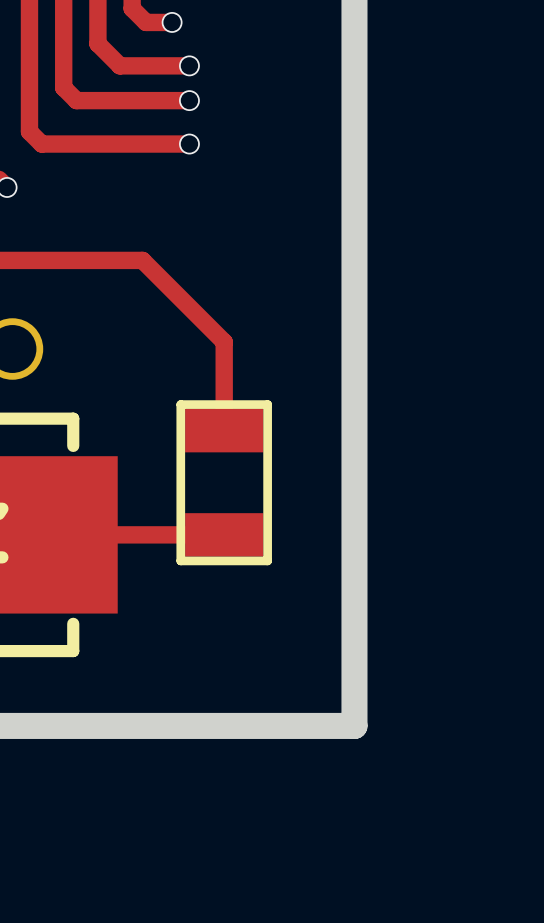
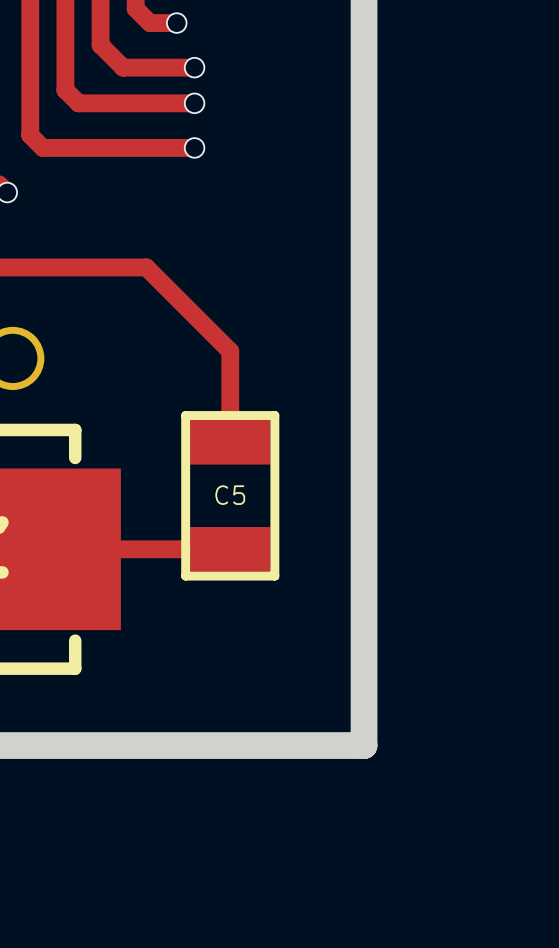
C5 name: none -> C5 (230, 495)

